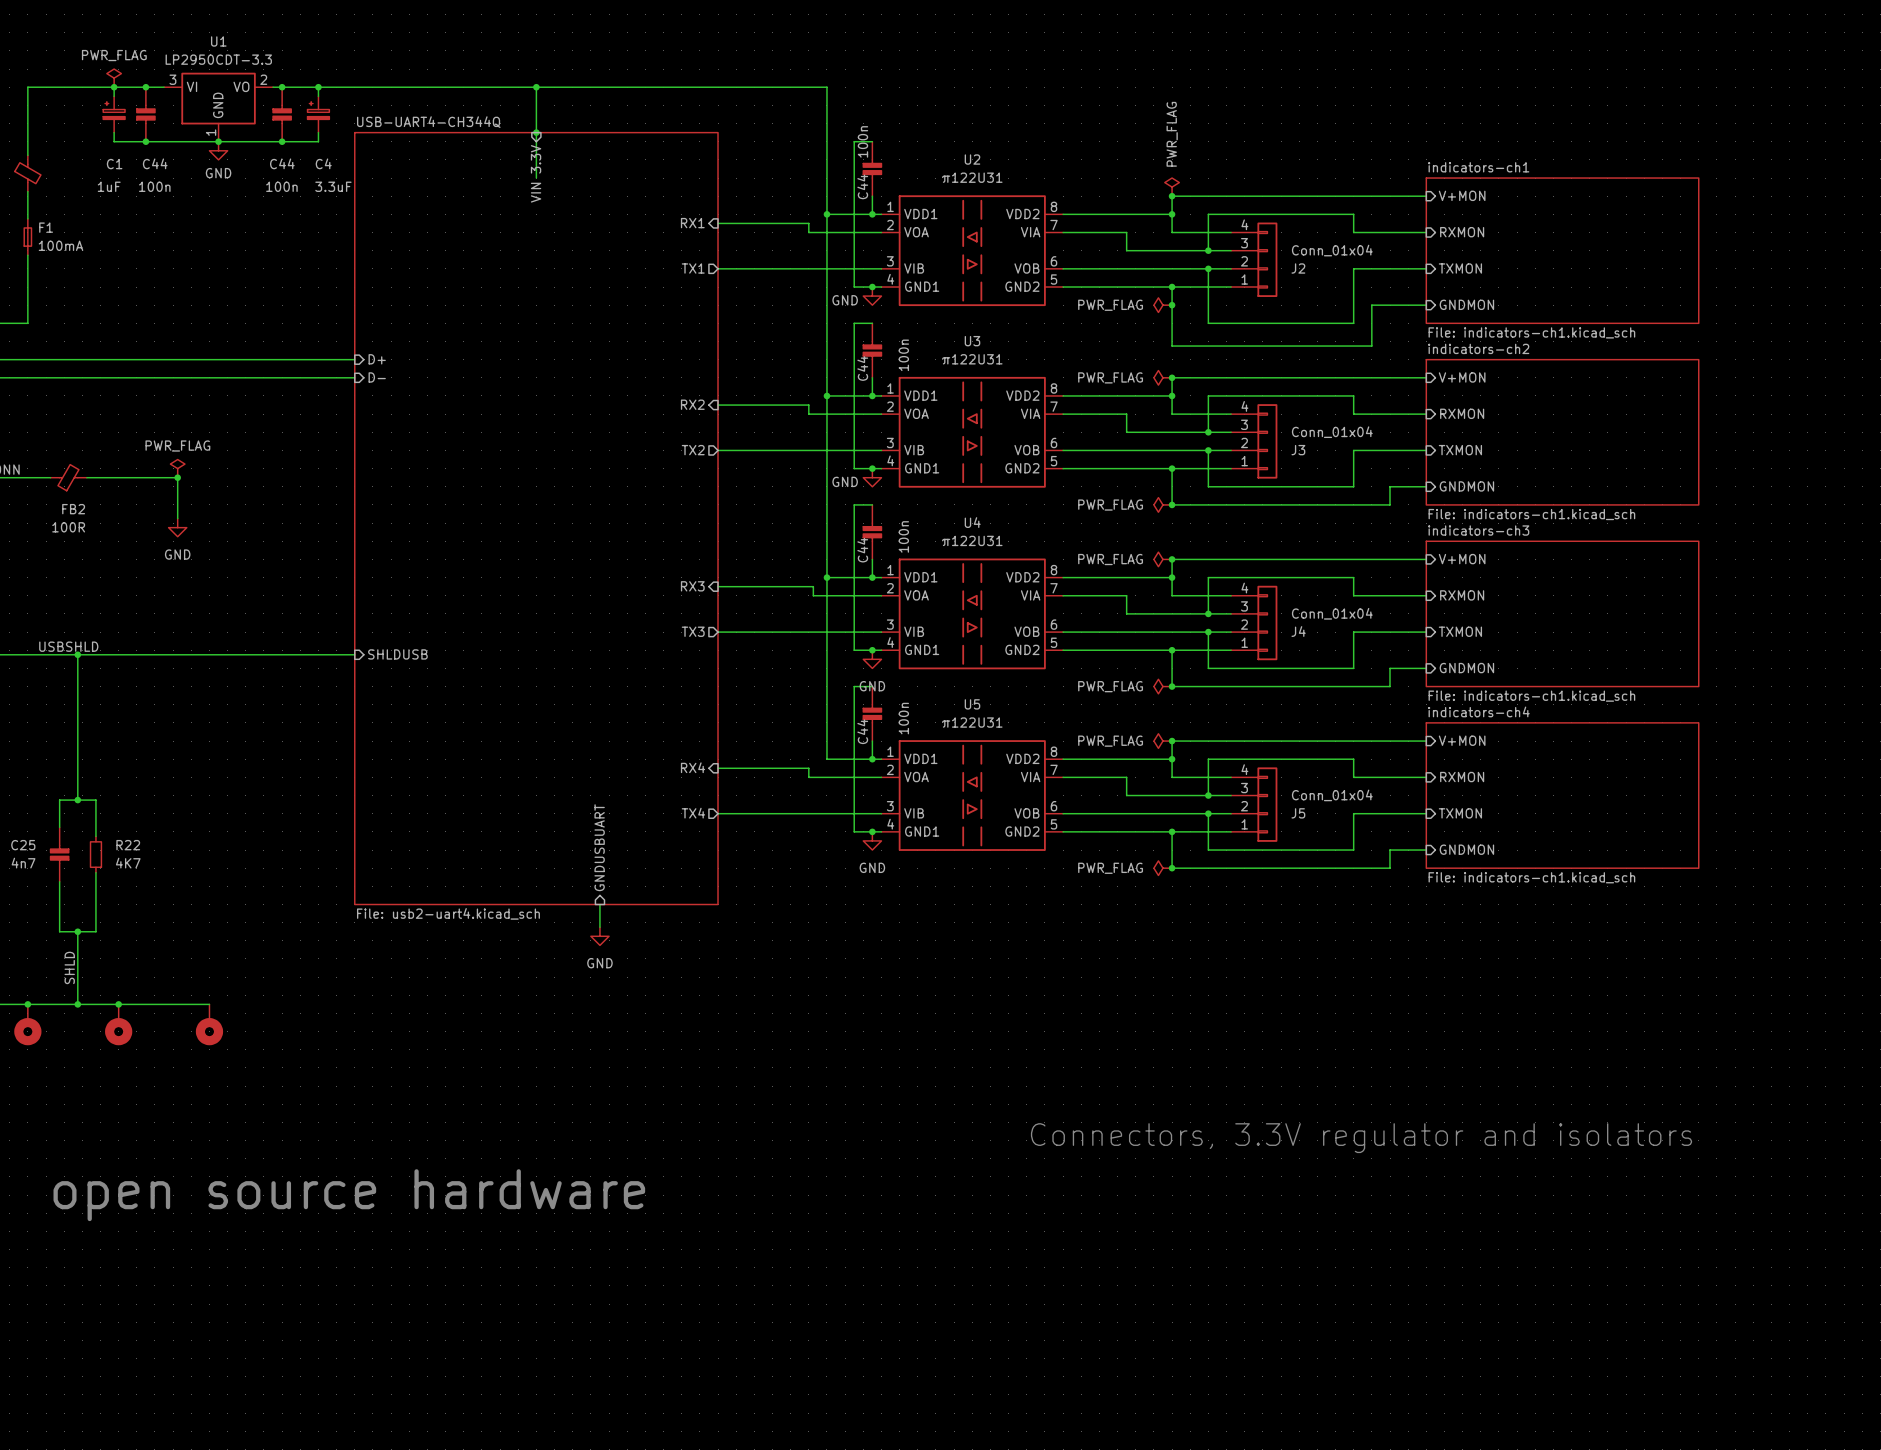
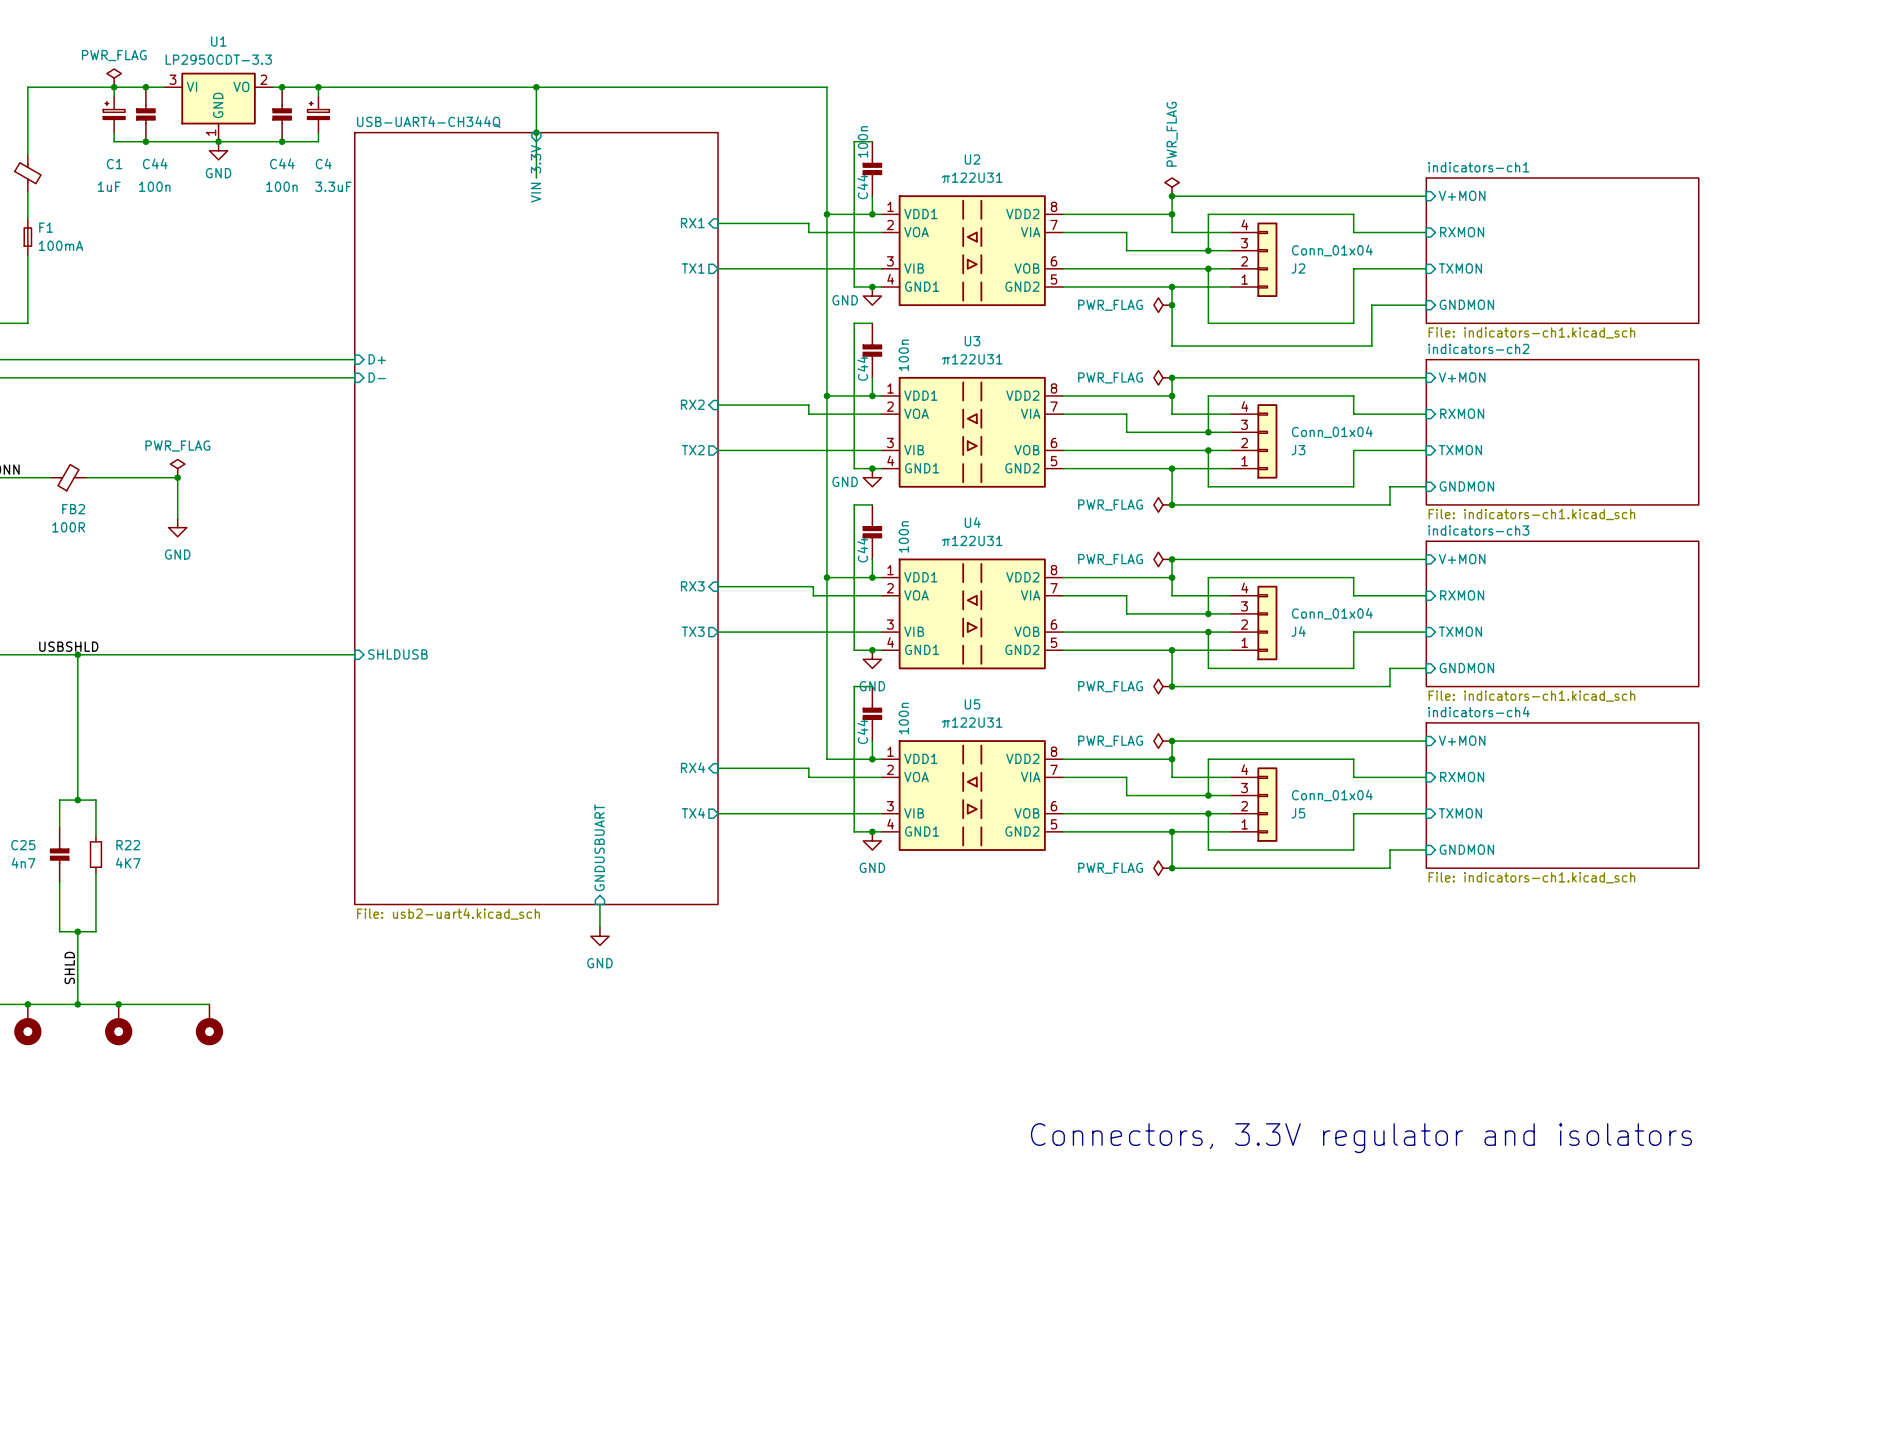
text: open source hardware (349, 1195) -> none

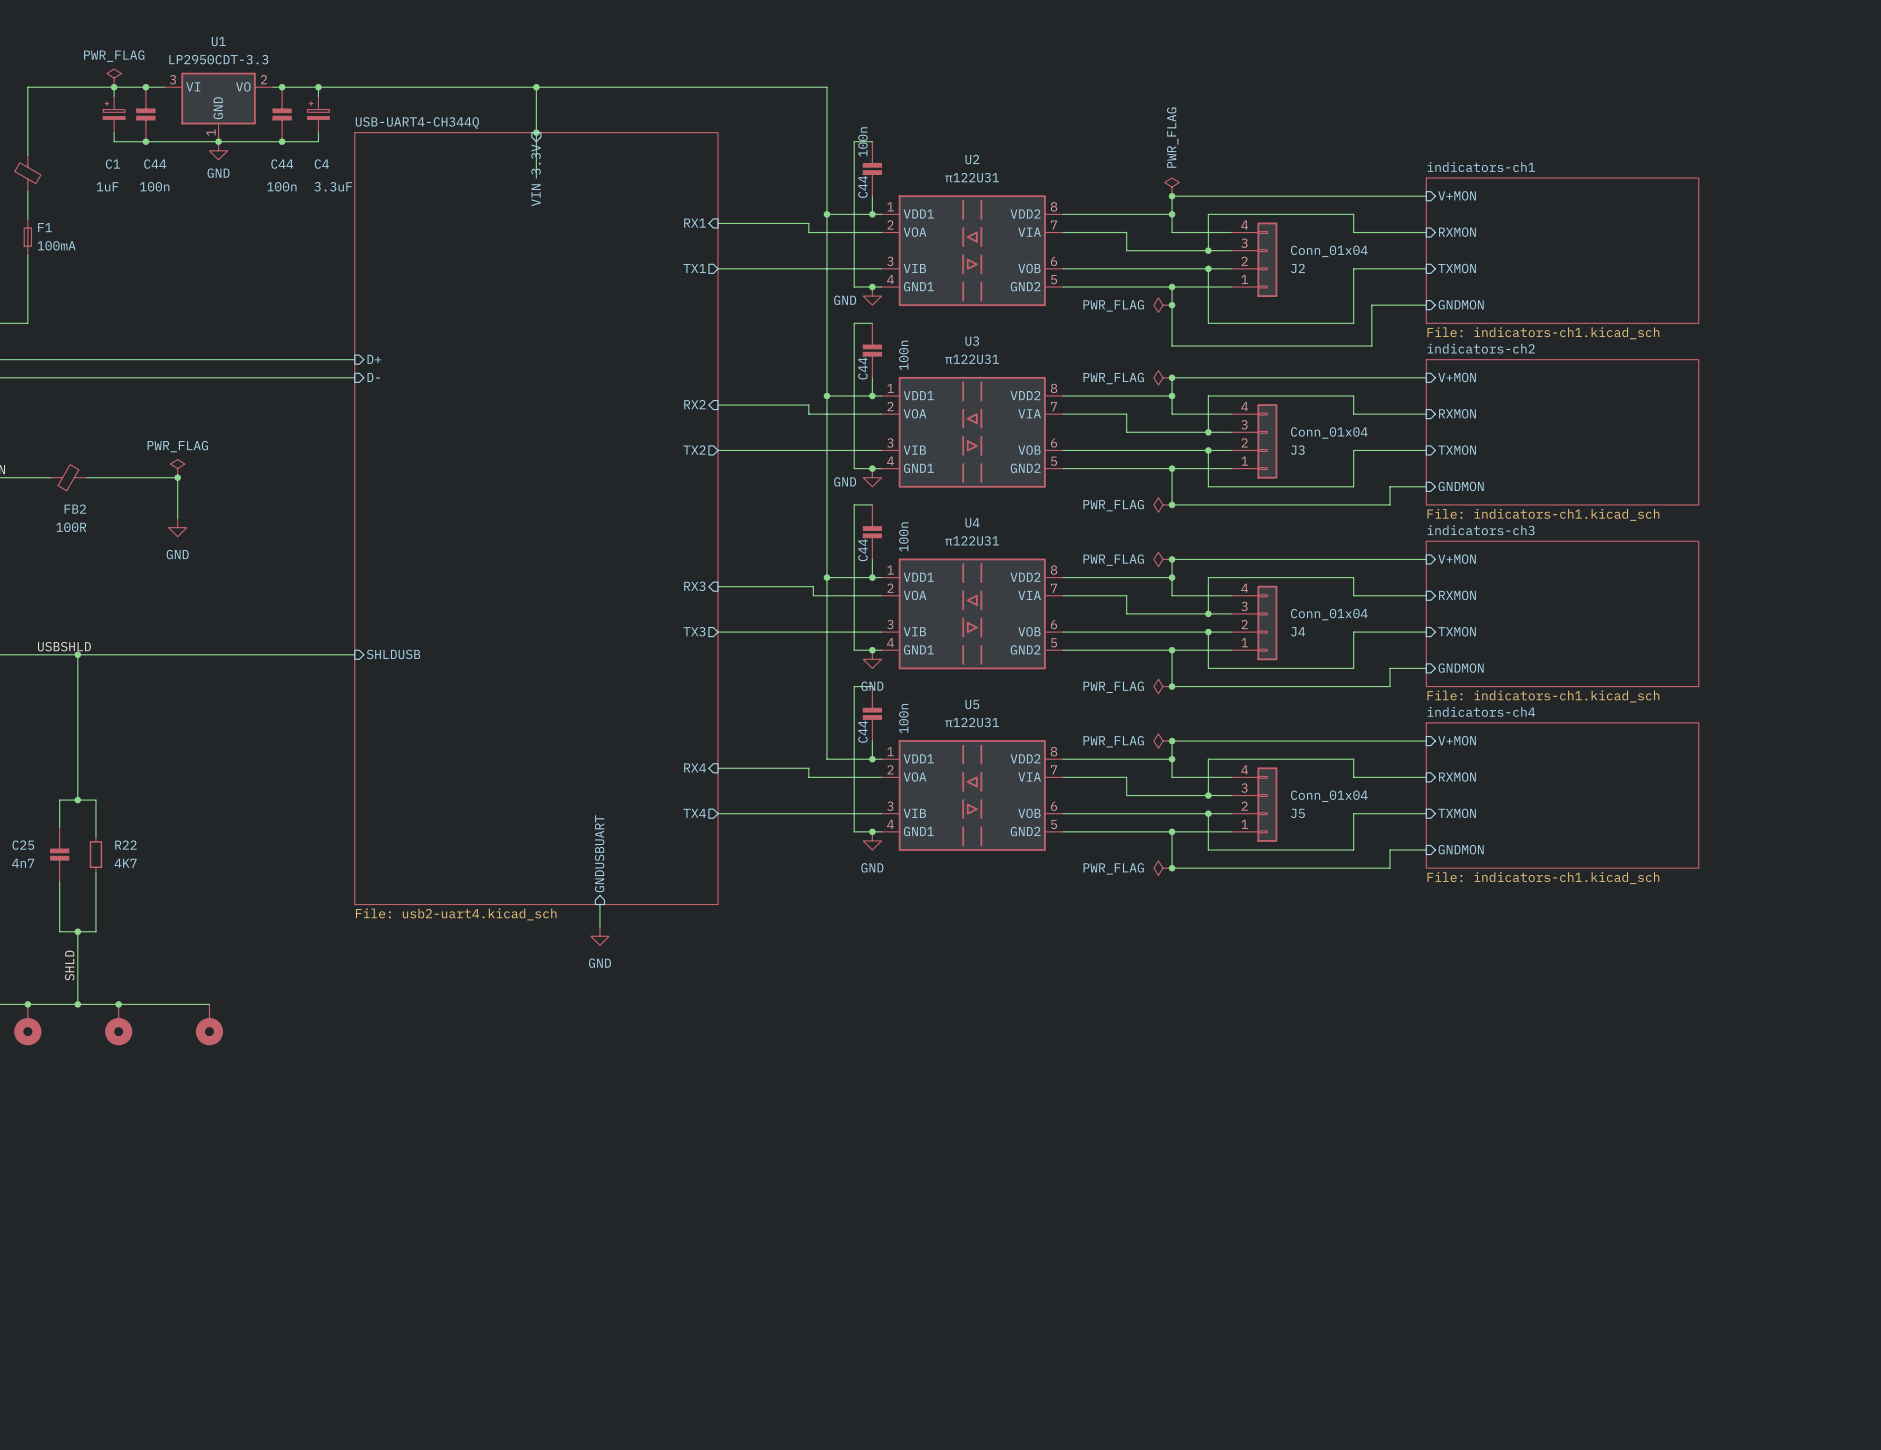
text: Connectors, 3.3V regulator and isolators (1361, 1138) -> none

